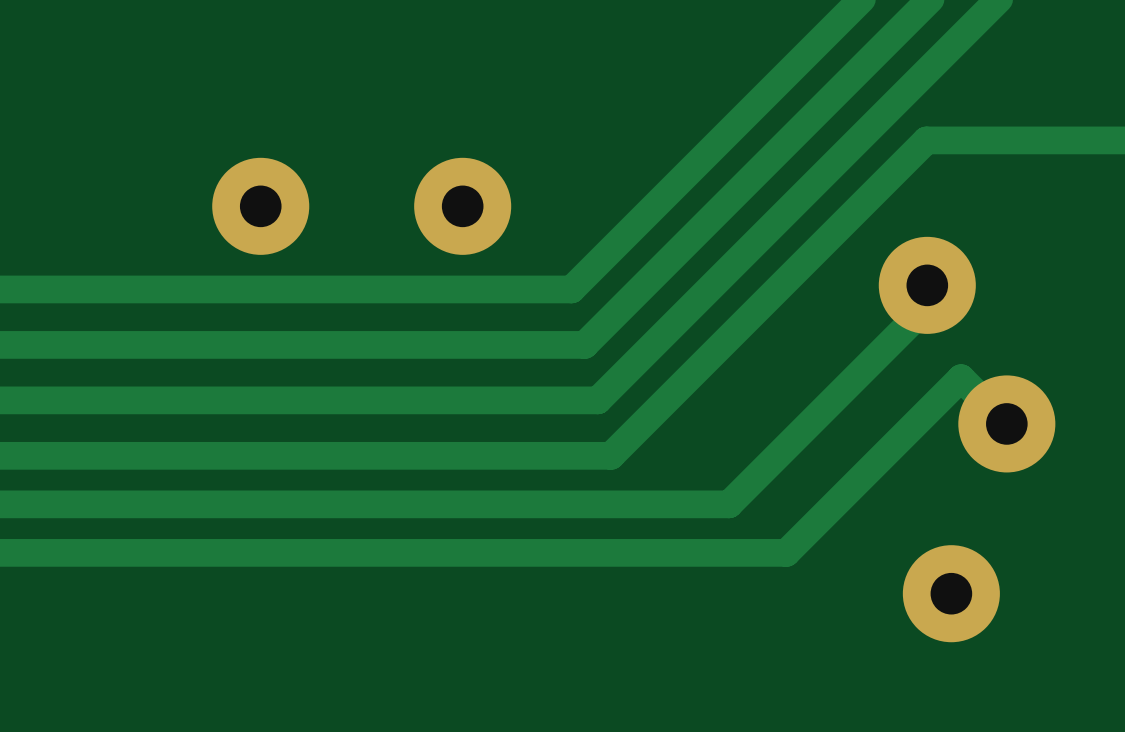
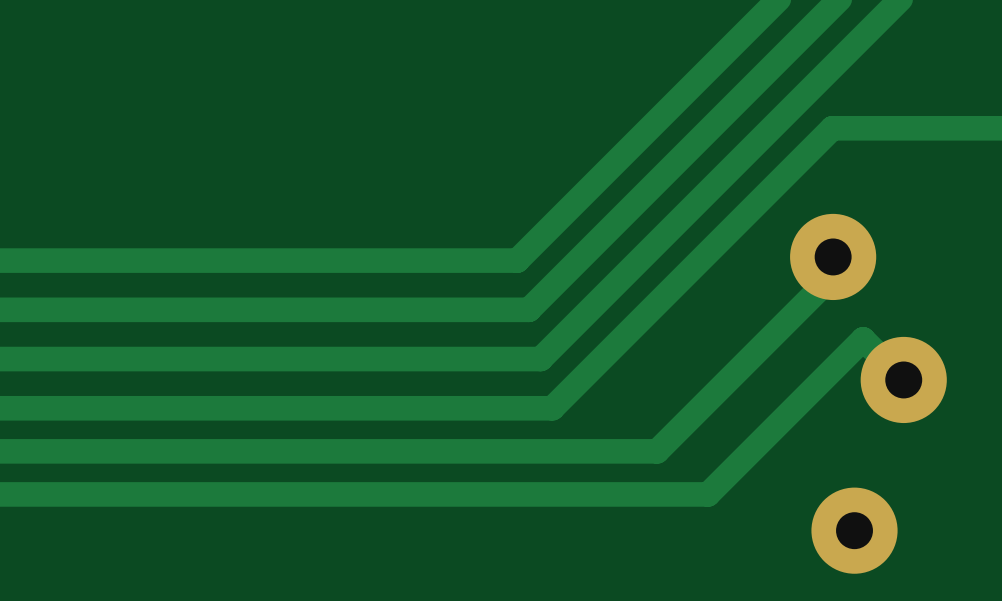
via: (260, 206) -> none
via: (462, 206) -> none

